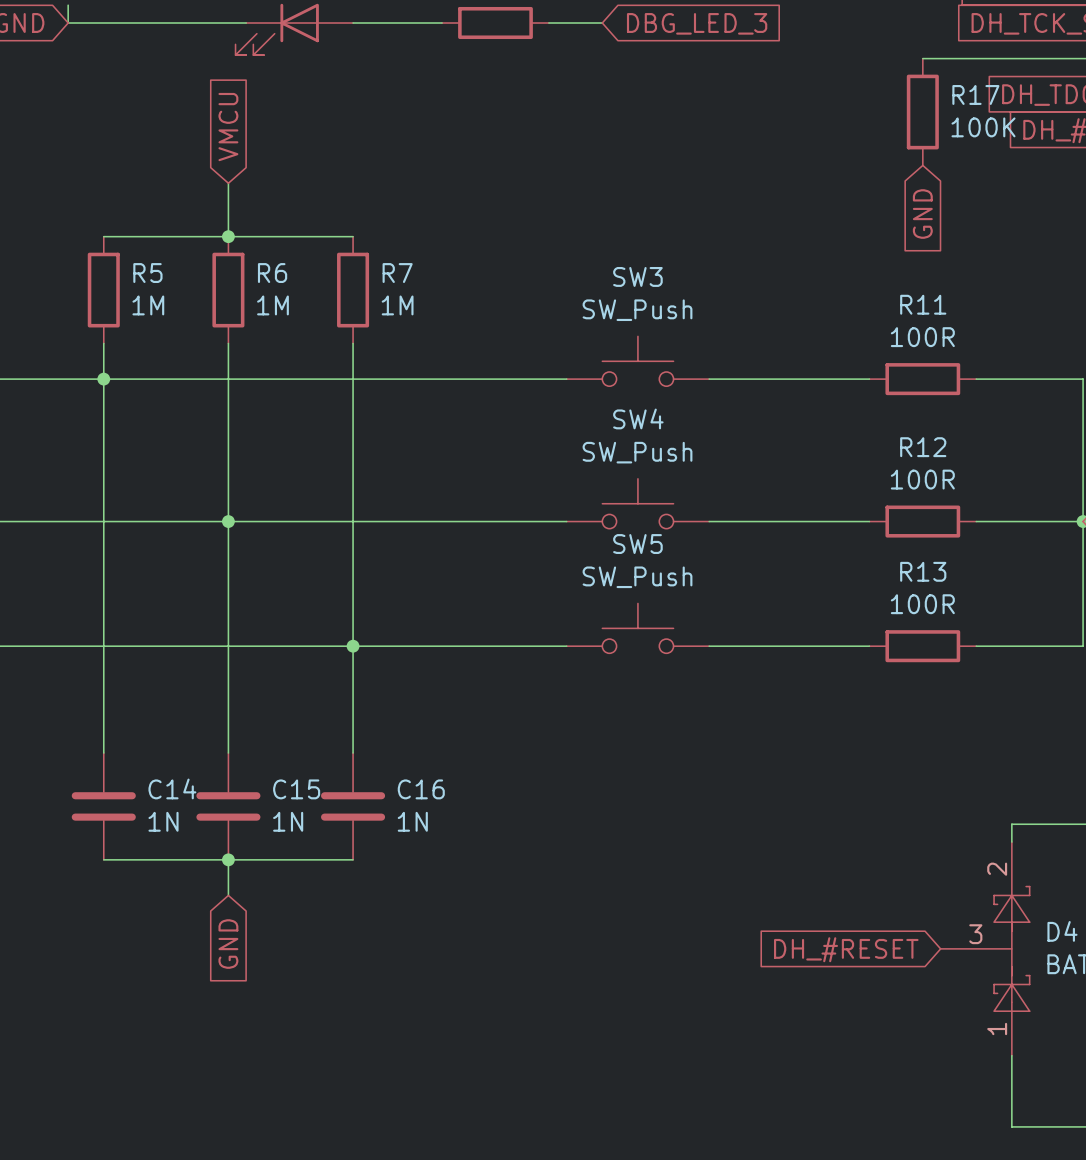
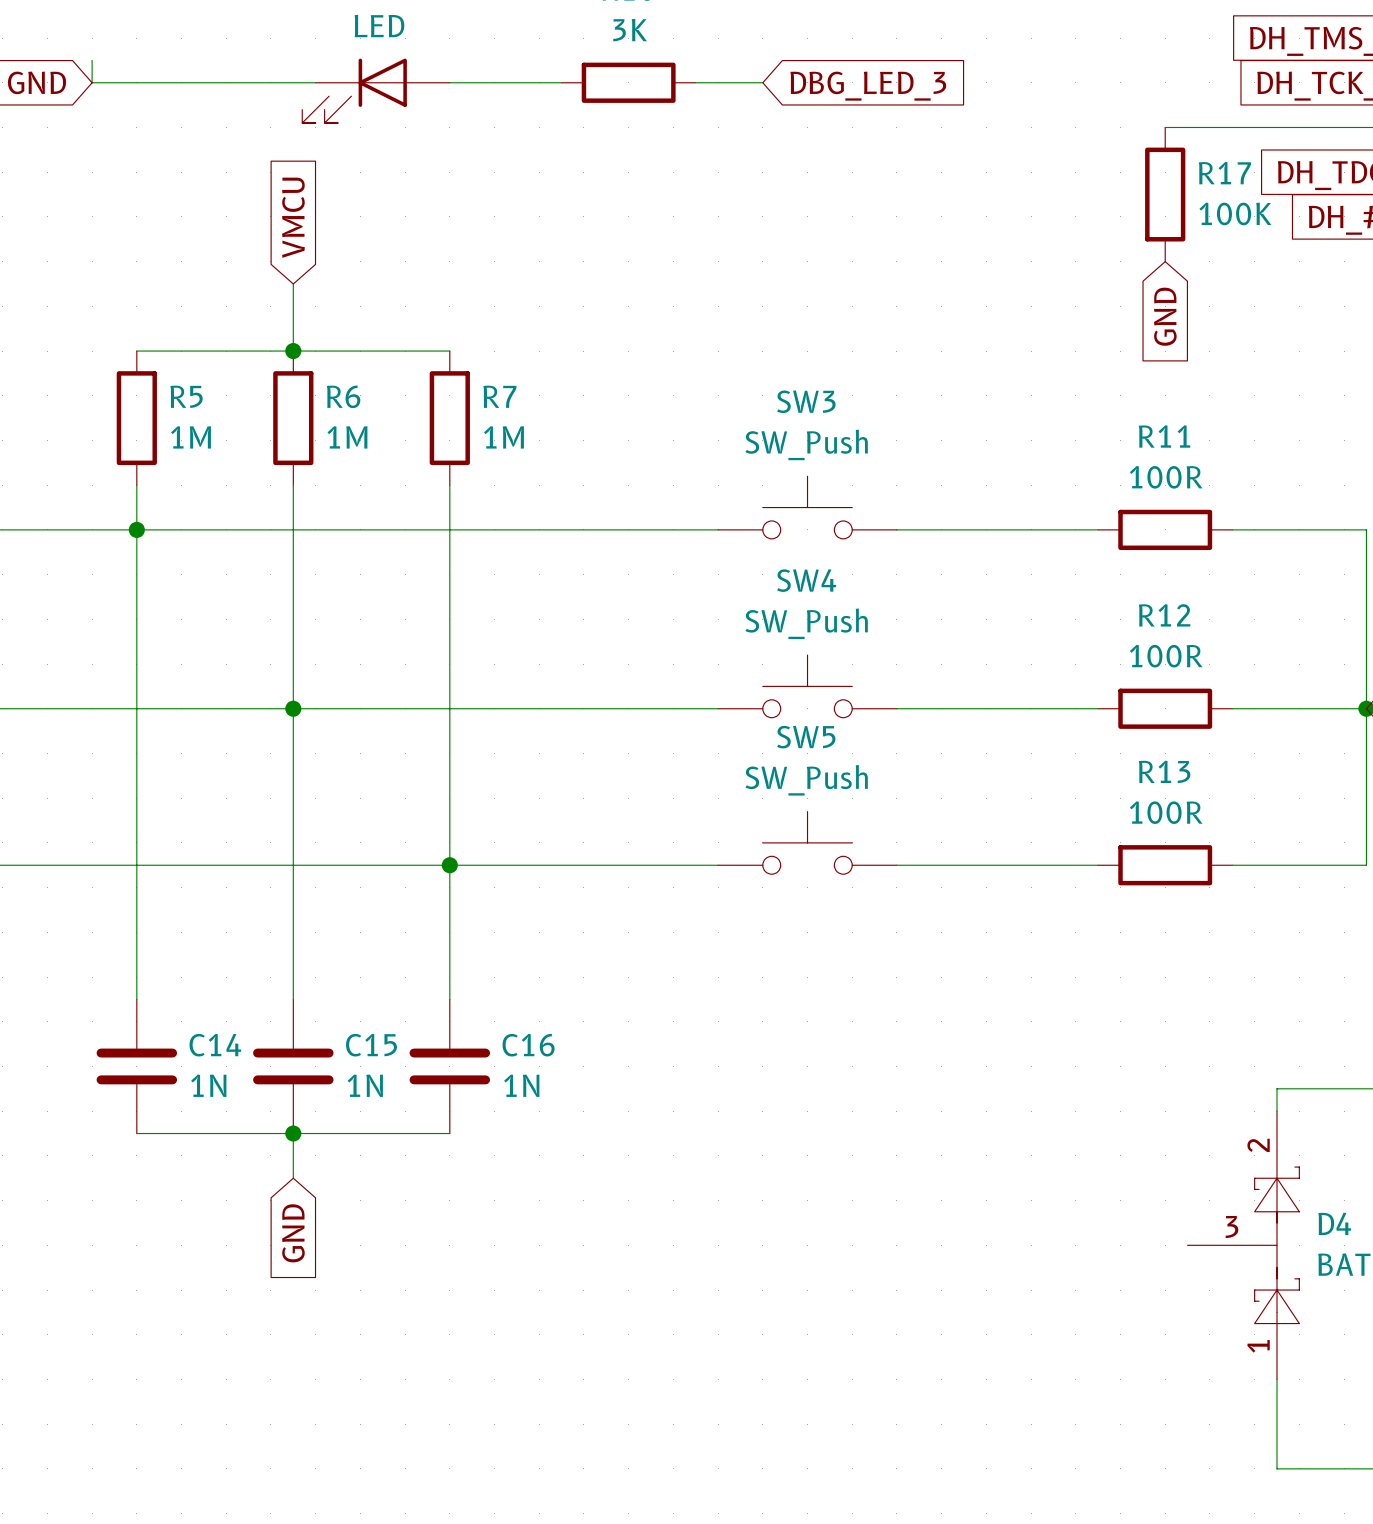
global label: DH_#RESET (846, 949) -> none

